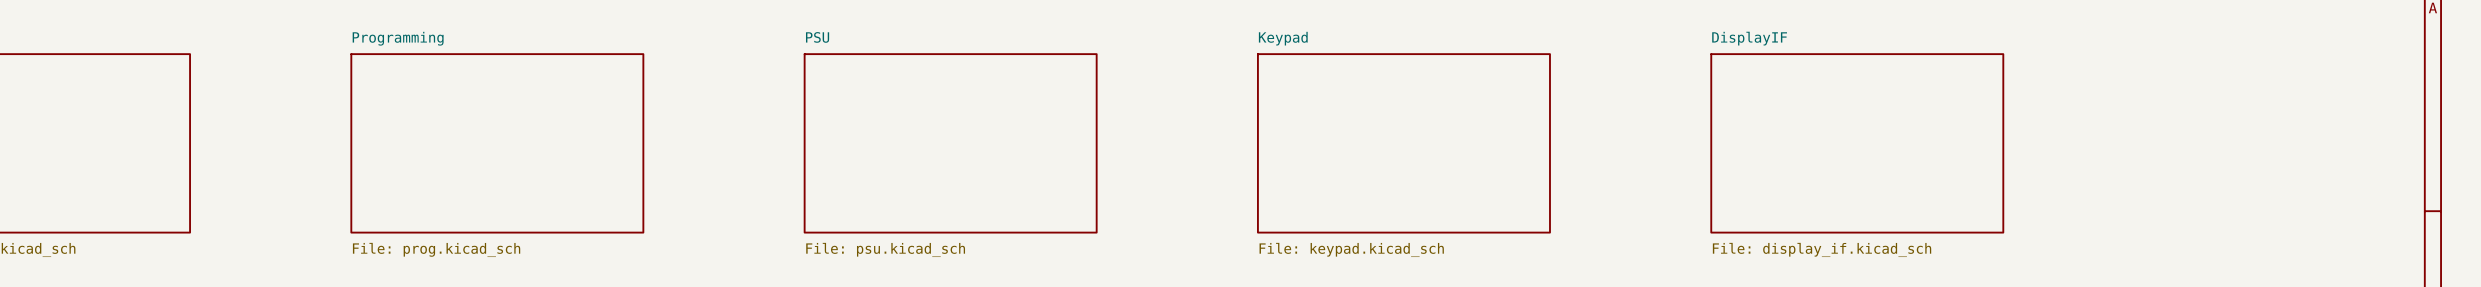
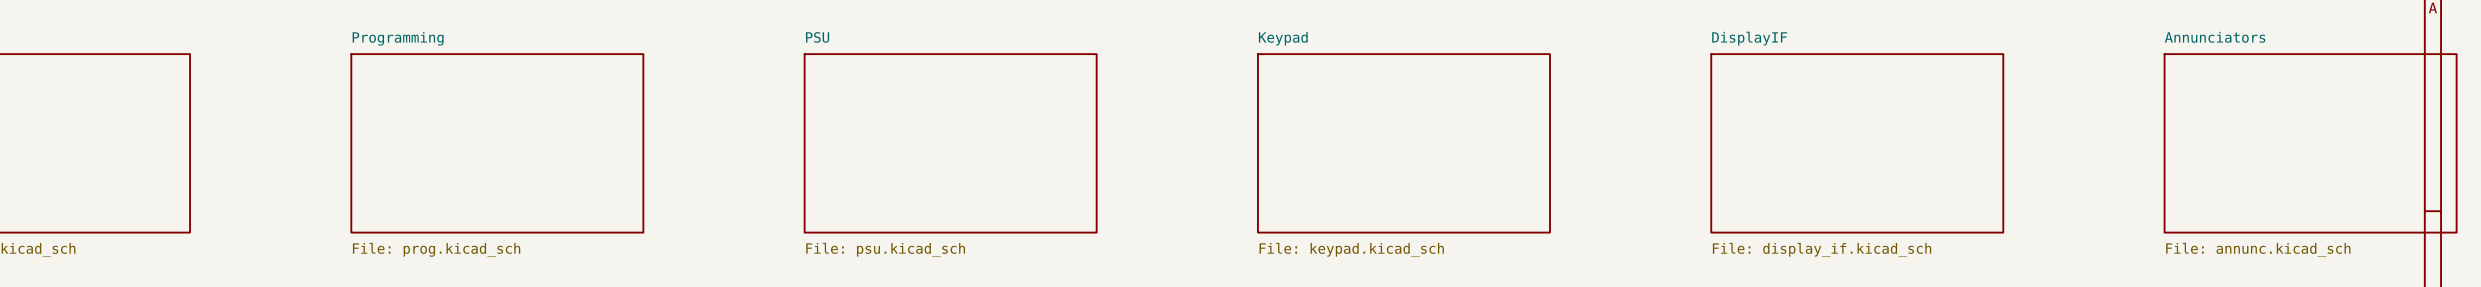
sheet Annunciators: none -> File: annunc.kicad_sch (2310, 143)

